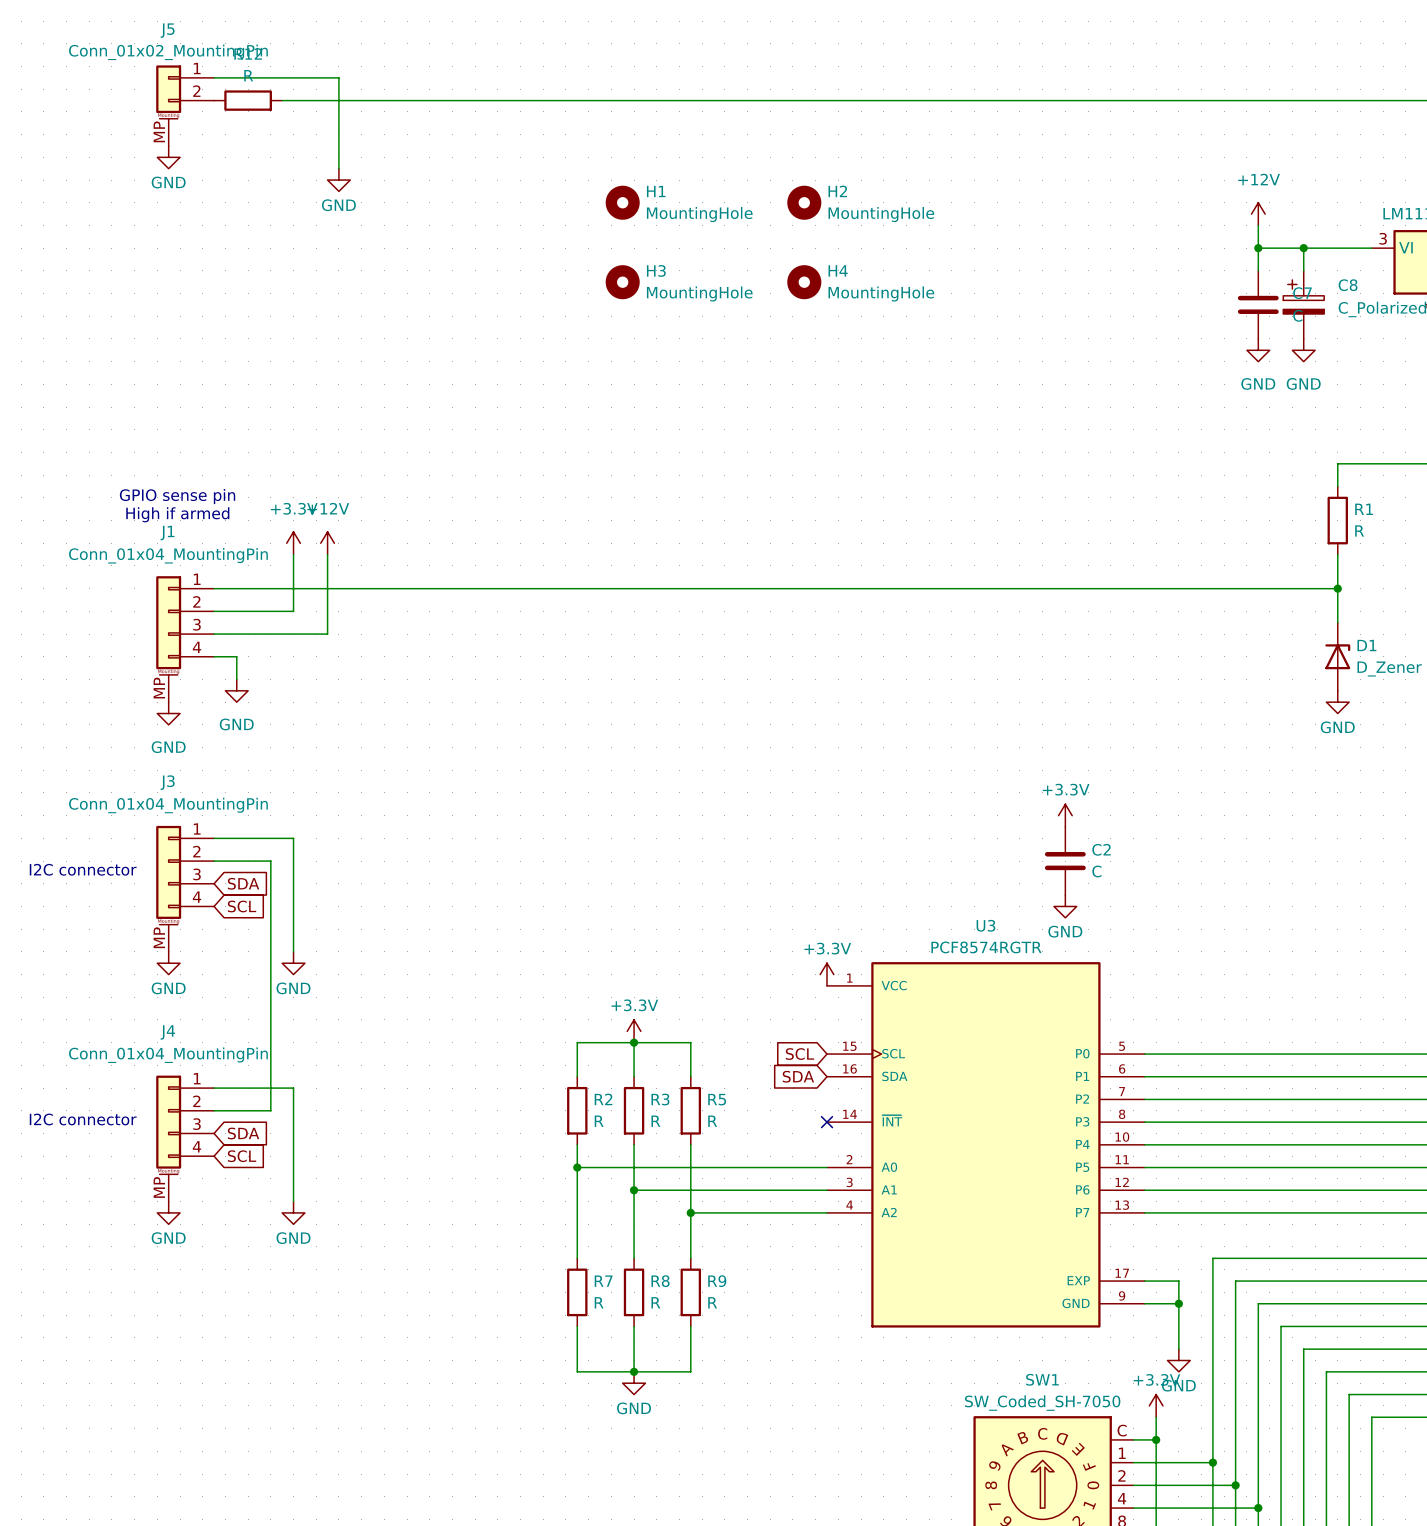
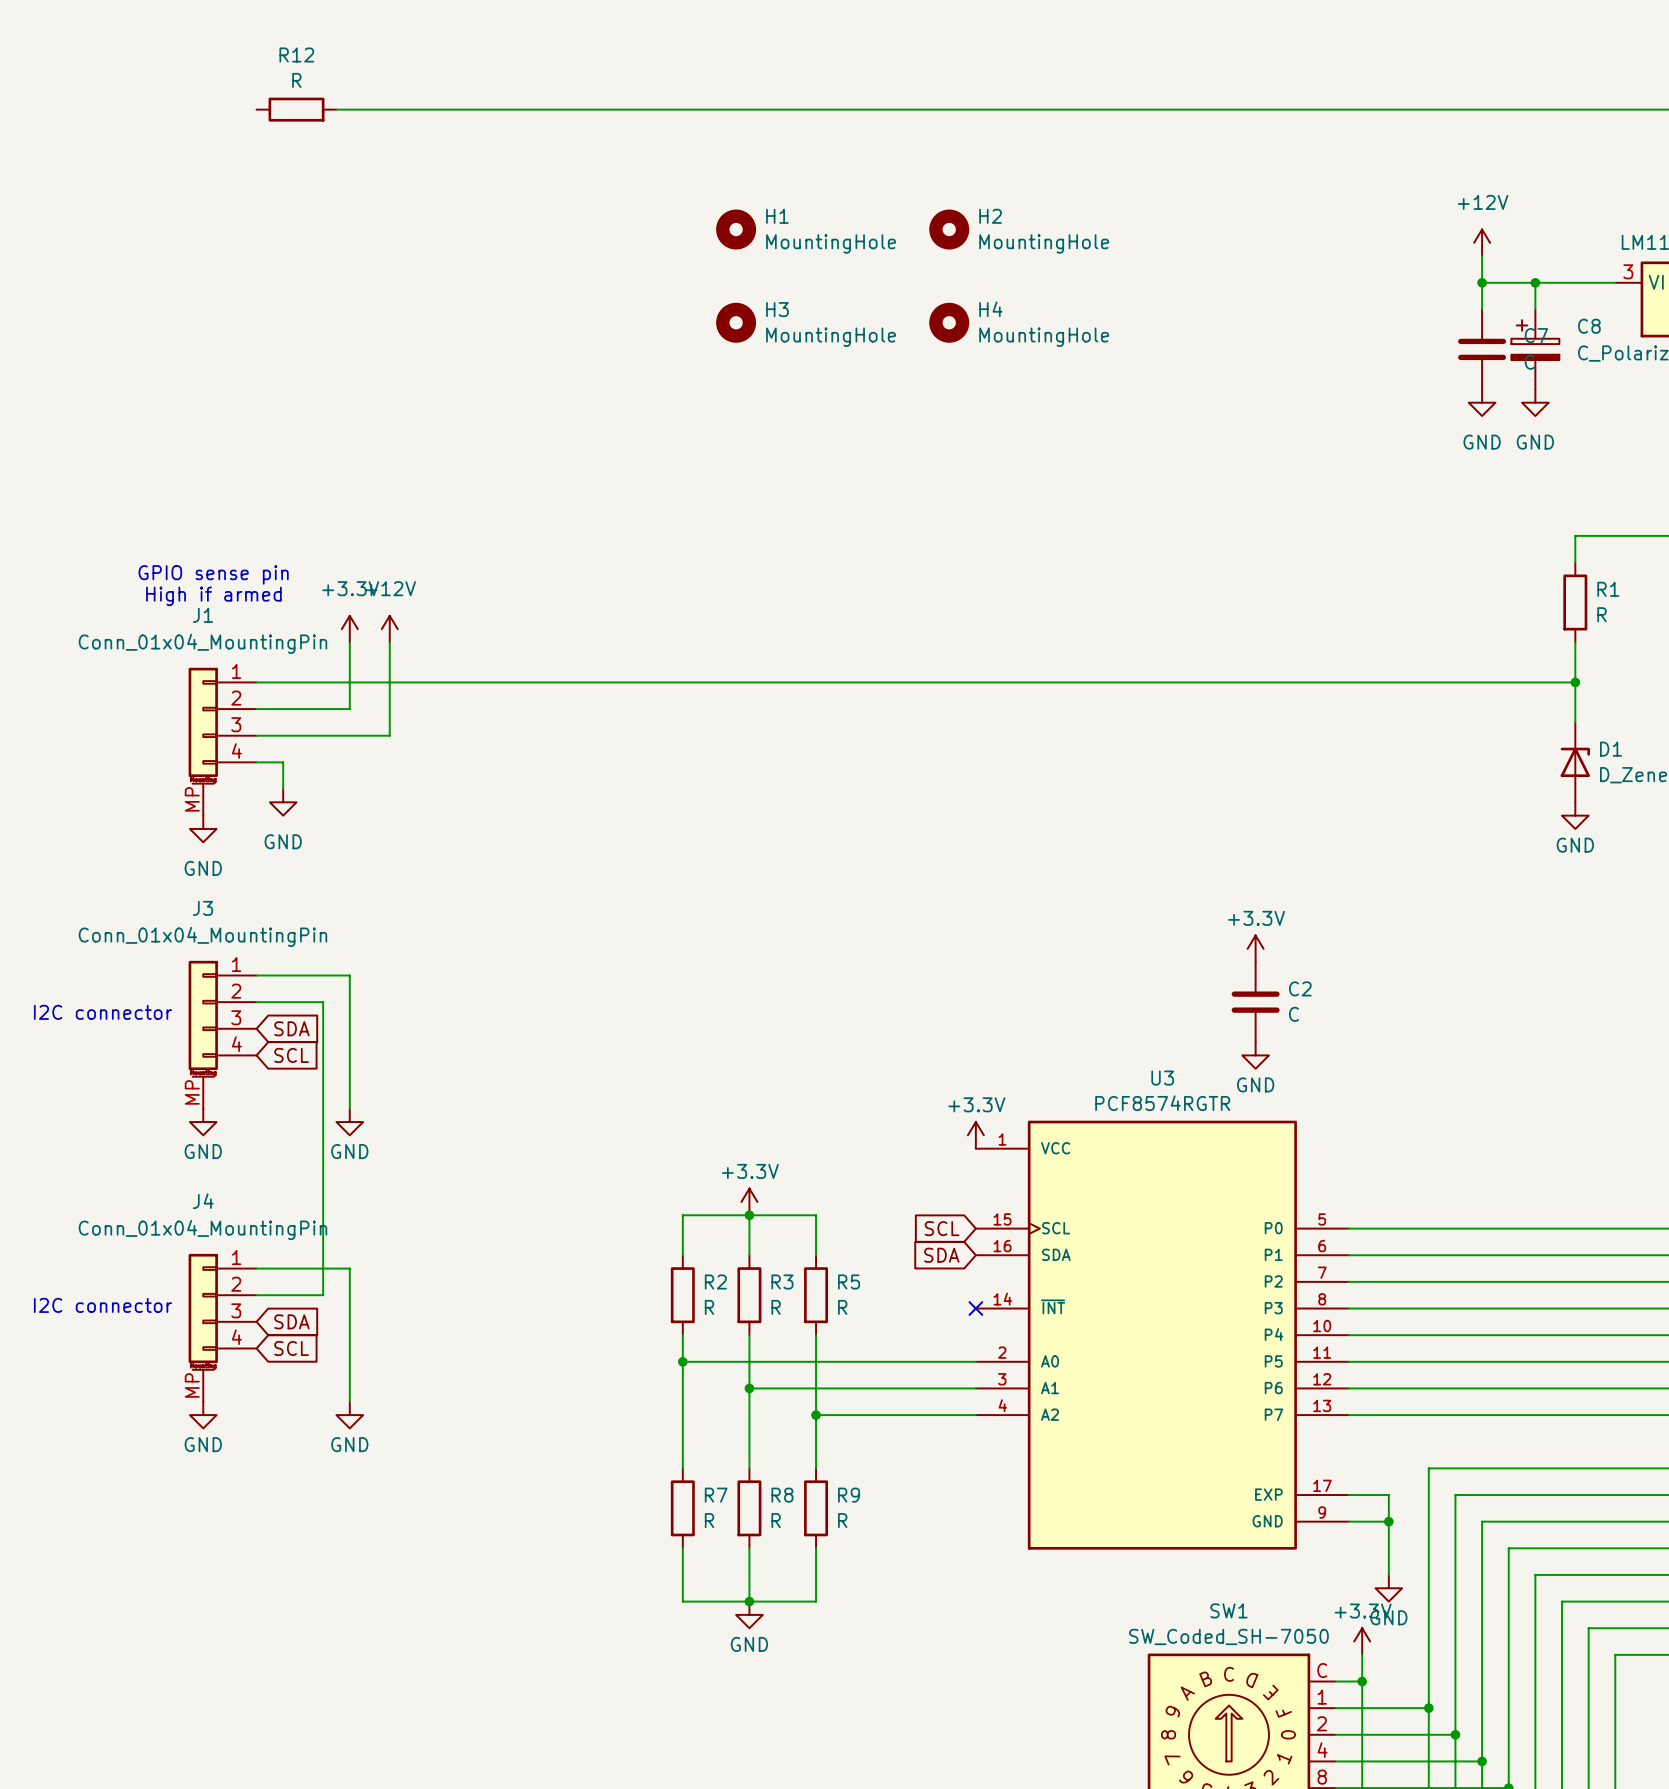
wire: (214, 77) (338, 77) (338, 168) -> none
J5: Conn_01x02_MountingPin (185, 105) -> none
power symbol: GND (168, 157) -> none
power symbol: GND (338, 180) -> none

